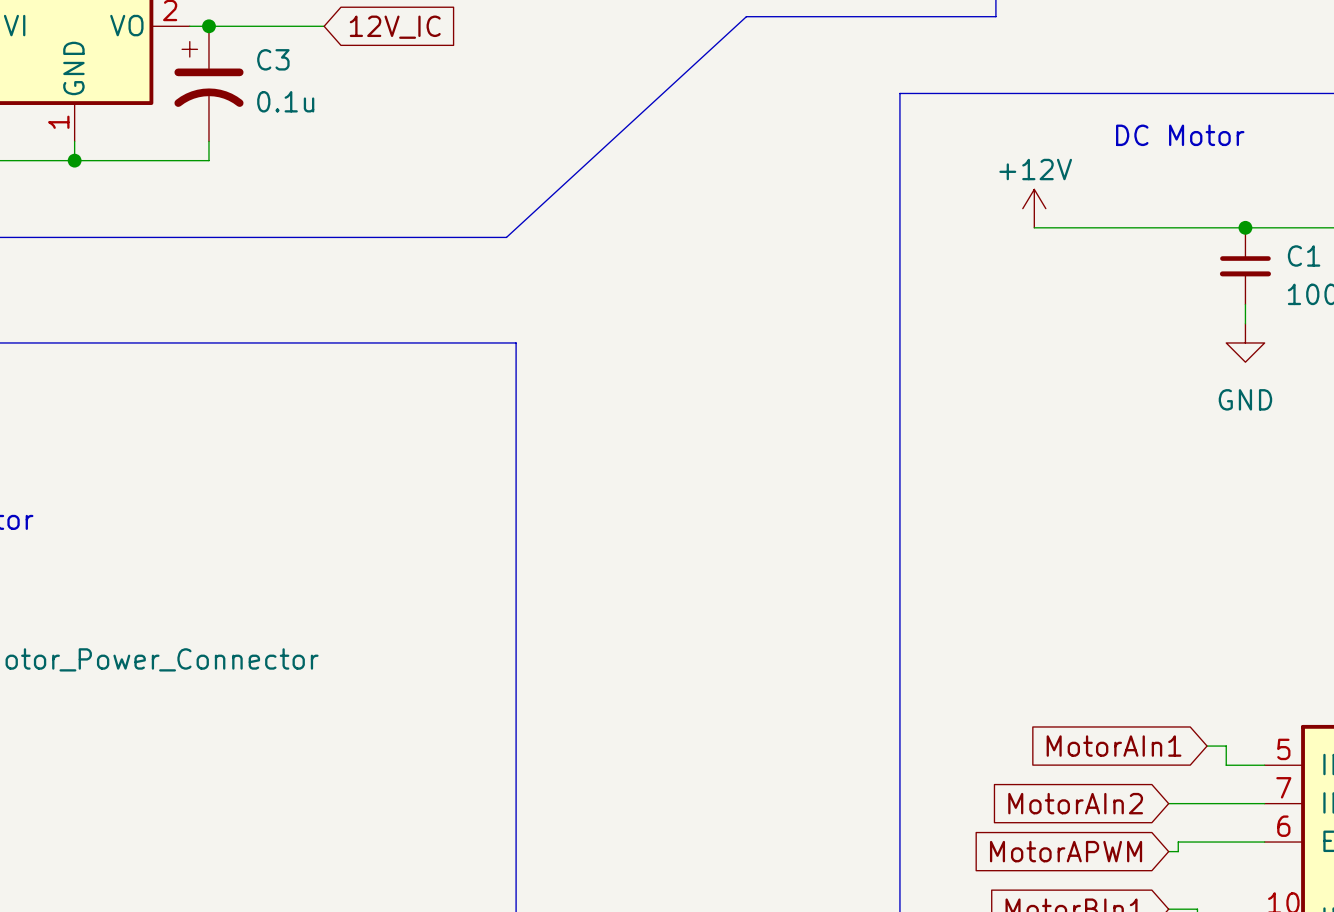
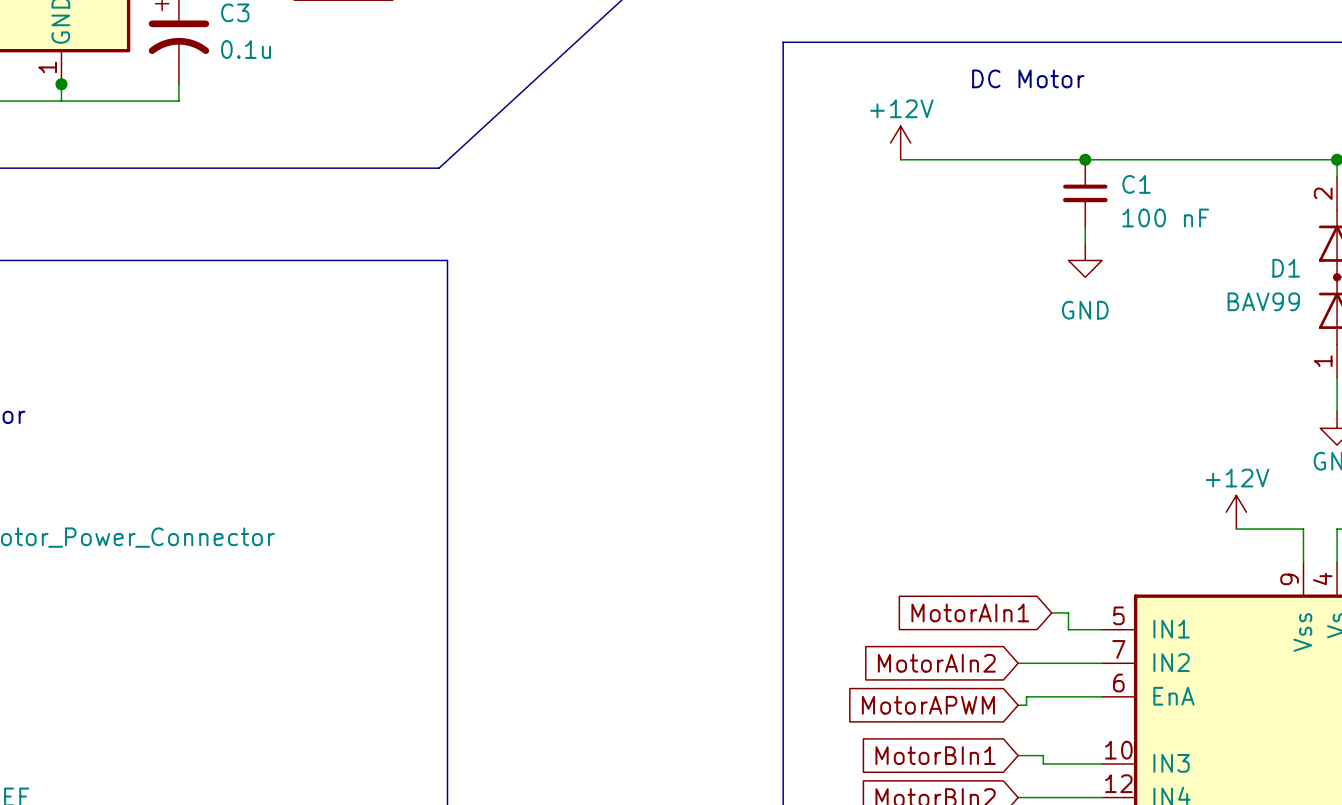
junction position: (74, 160) -> (61, 84)

